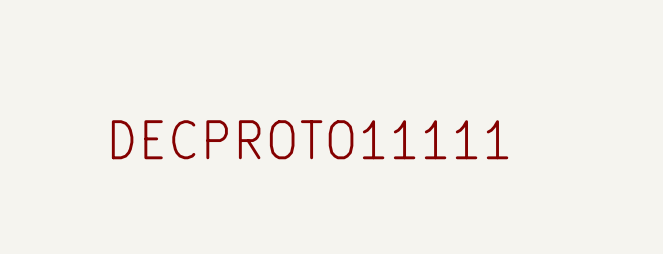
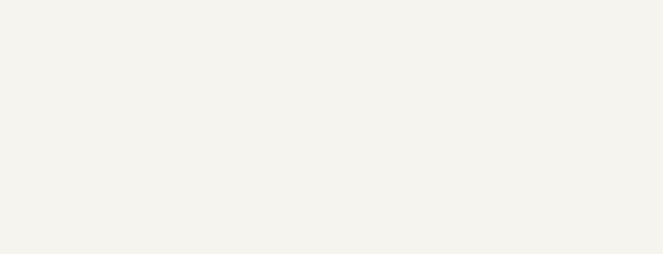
part: DECPROTO11111 (310, 139) -> none

